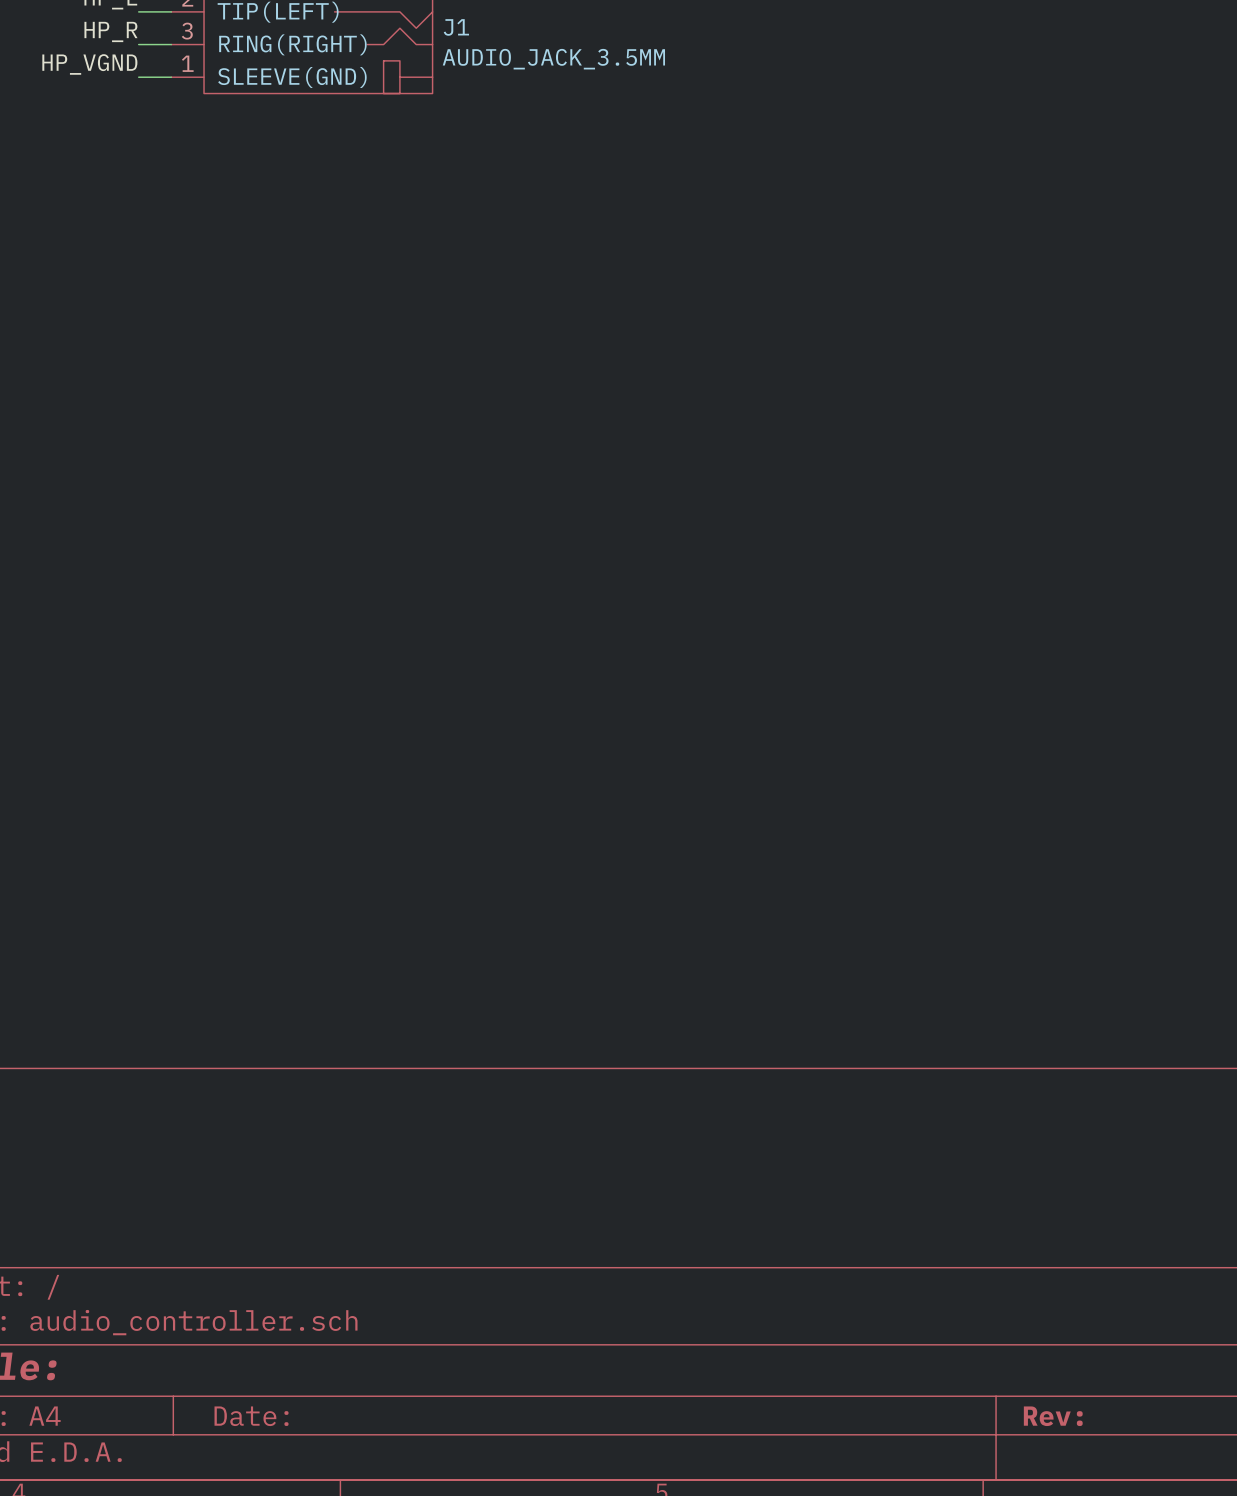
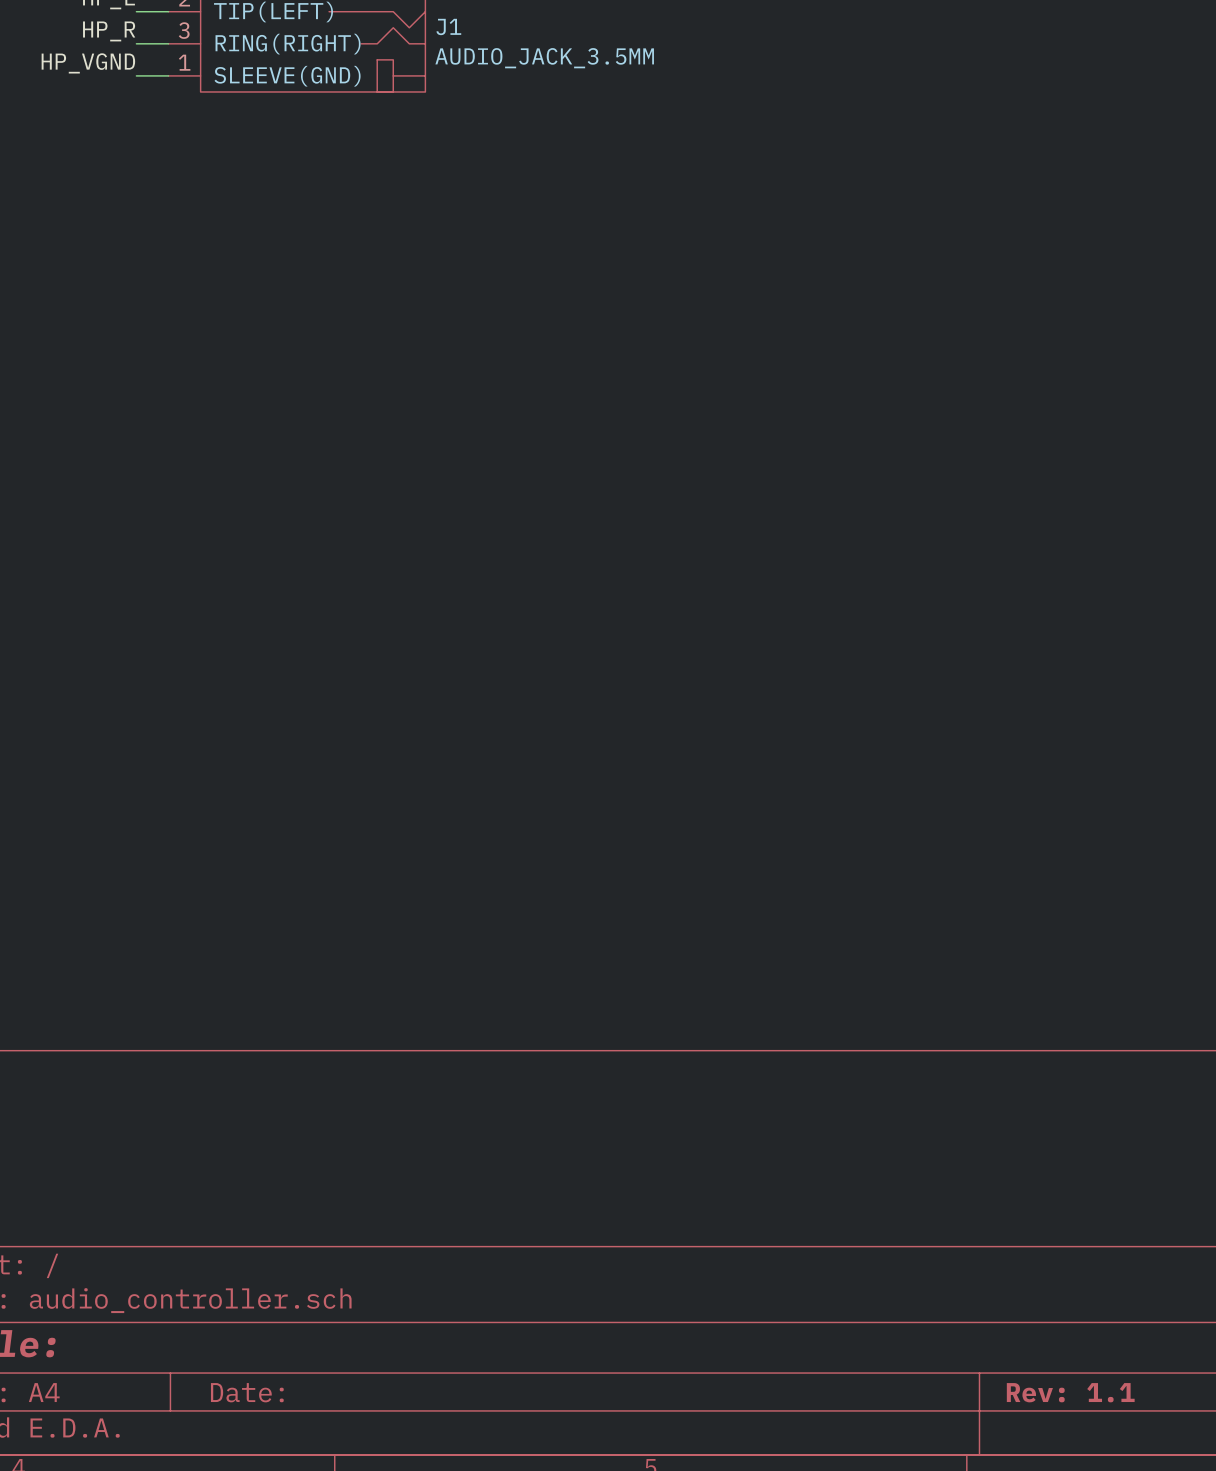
title block: Rev: (1053, 1416) -> Rev: 1.1 (1070, 1392)

